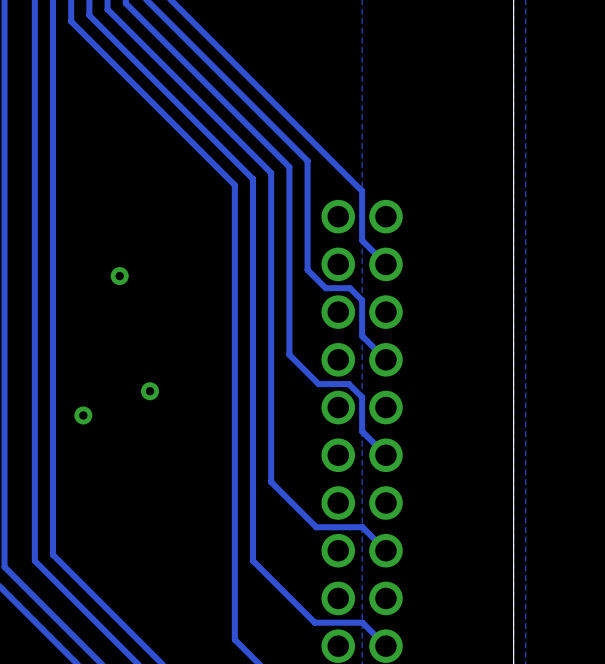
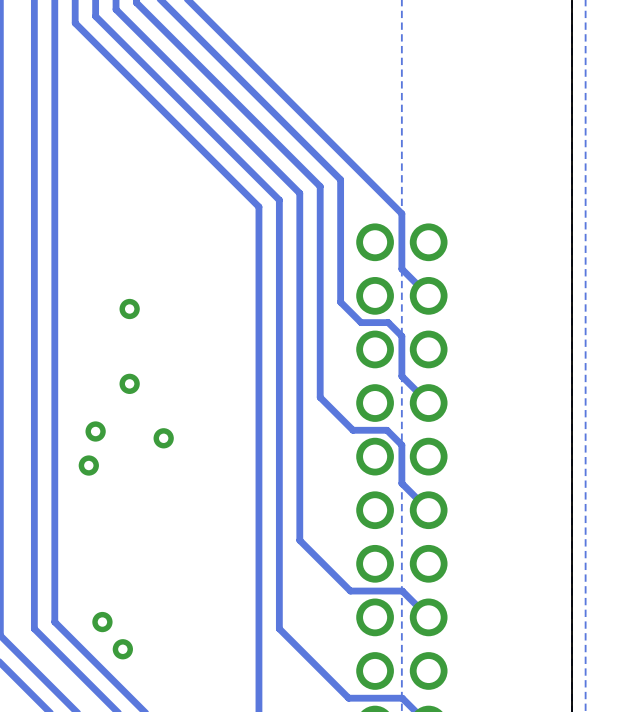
via: none -> (129, 383)
via: none -> (95, 431)
via: none -> (102, 622)
via: none -> (122, 649)

